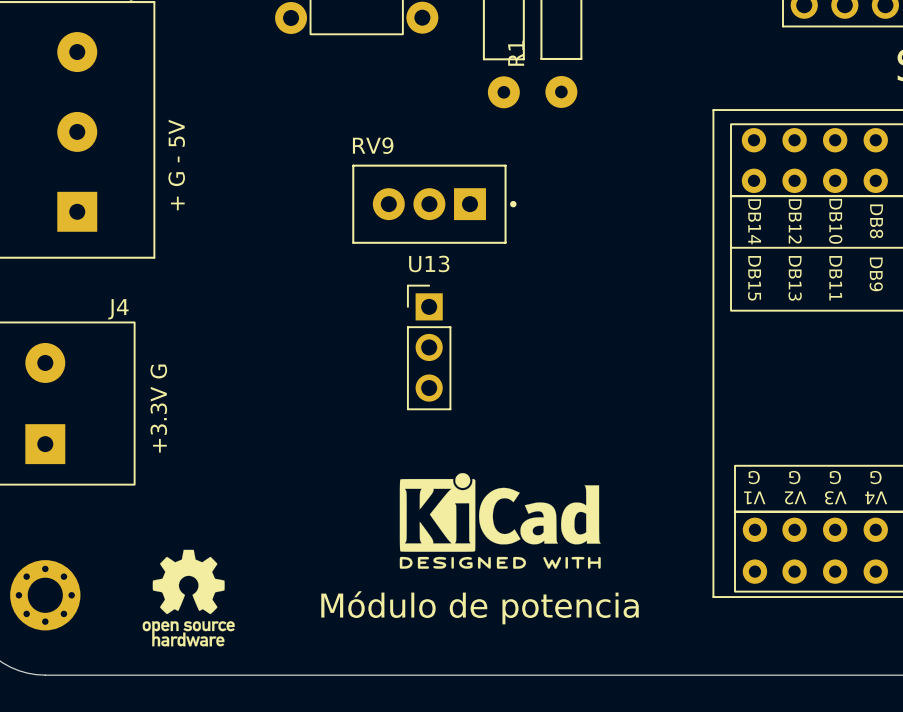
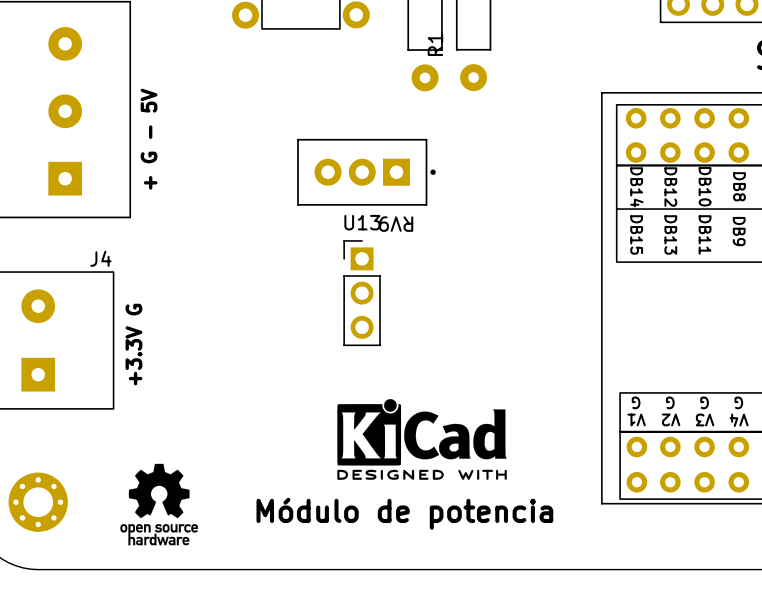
RV9 name rotation: 0° (373, 145) -> 180° (396, 224)
RV9 name position: RV9 (373, 145) -> RV9 (396, 224)

